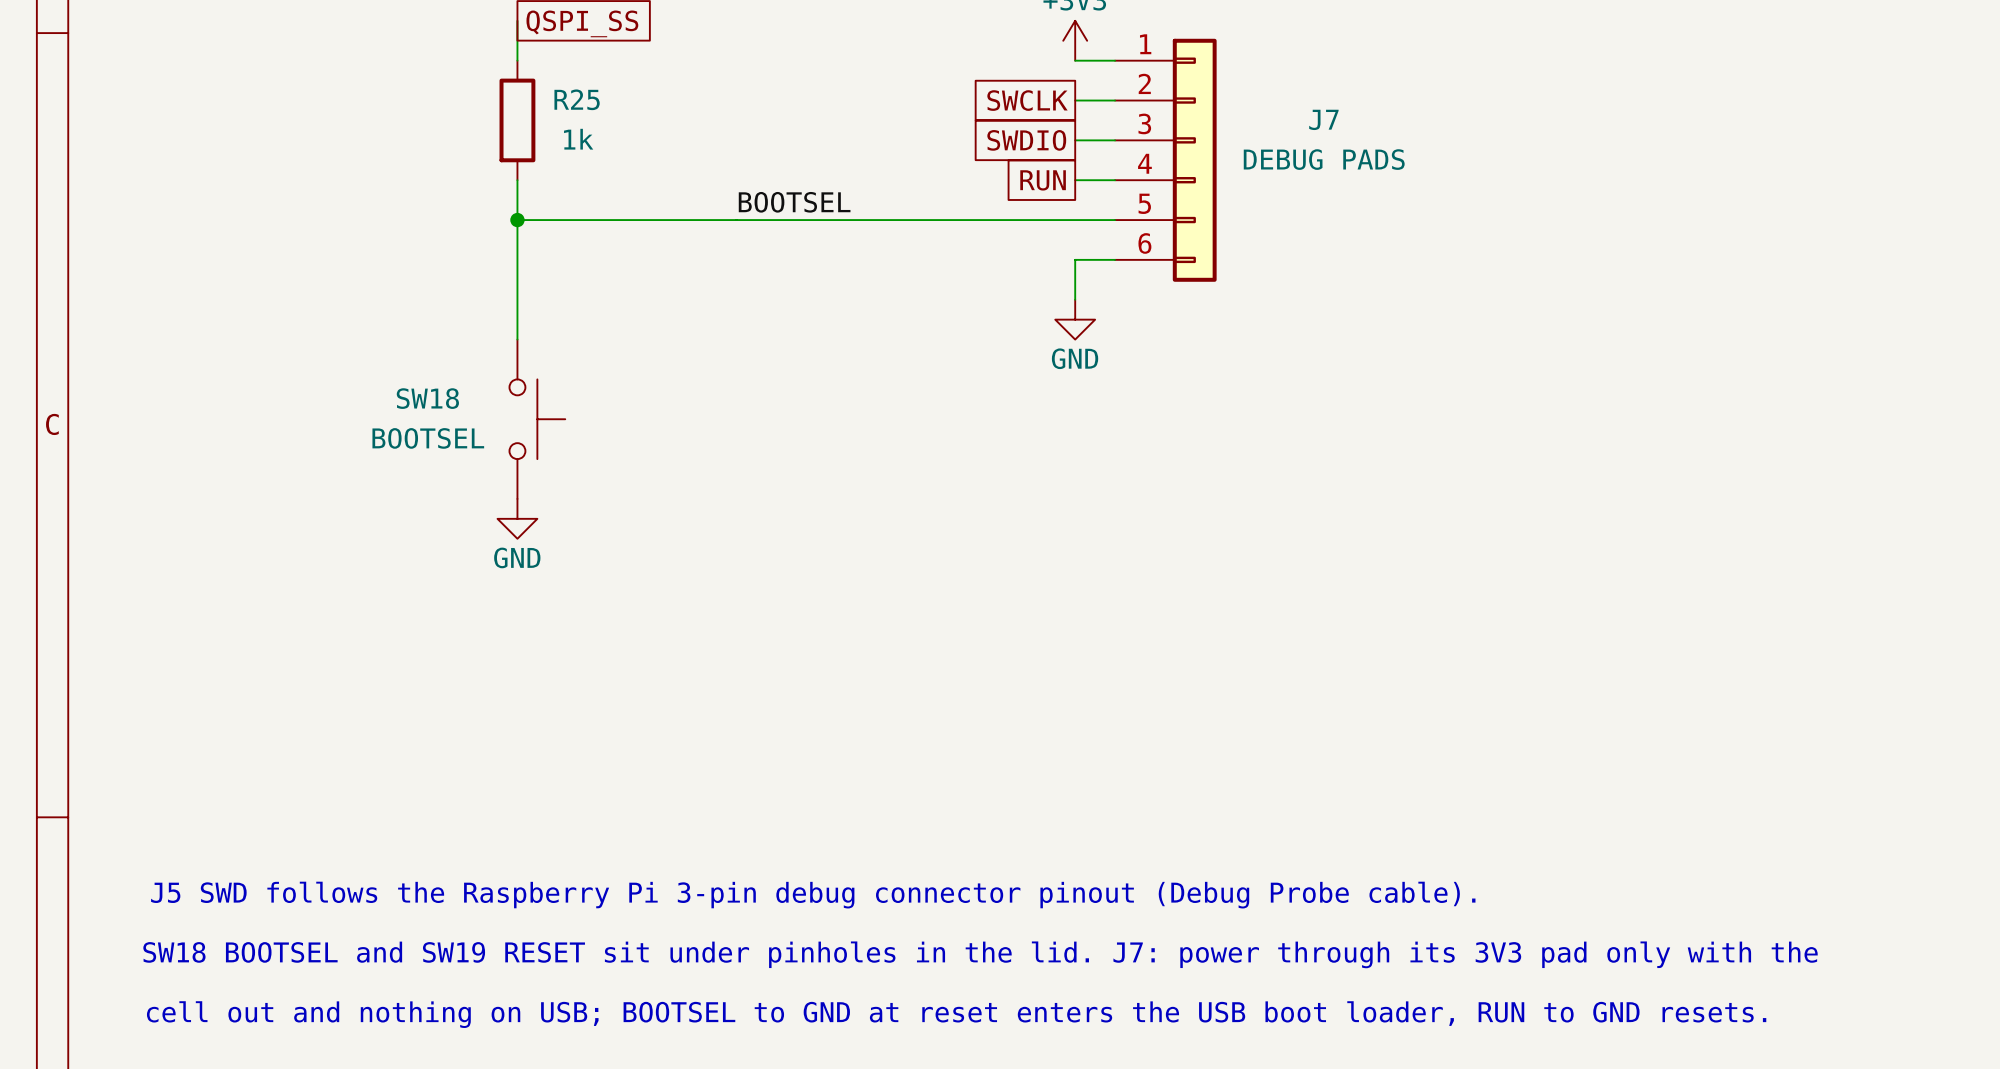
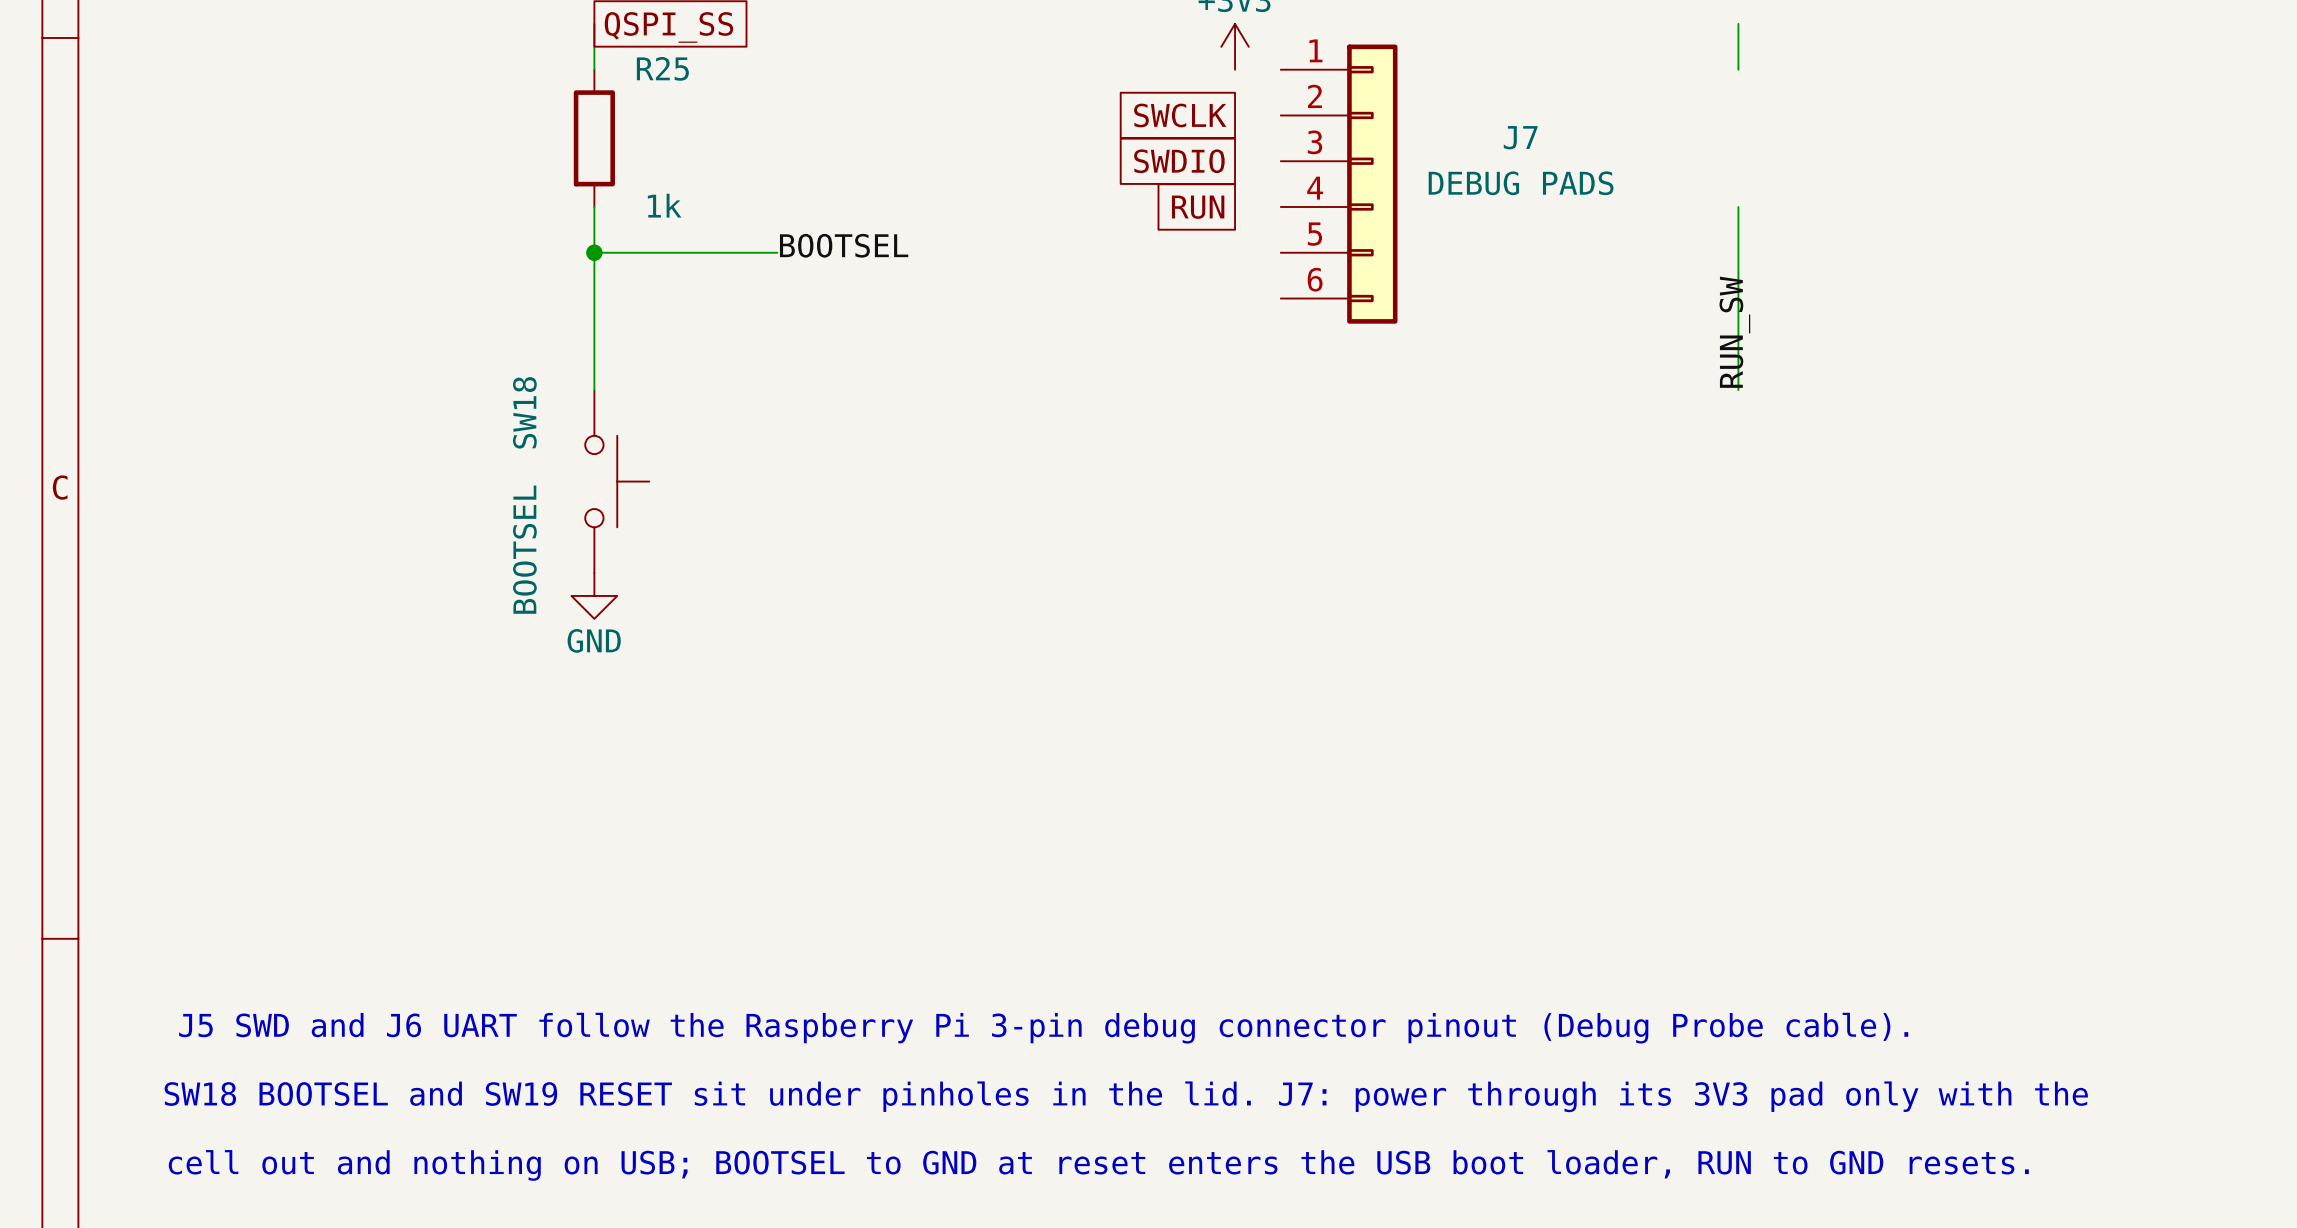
wire: none -> (1738, 23) (1738, 69)
wire: (1075, 60) (1115, 60) -> none
R25 name position: R25 (577, 99) -> R25 (662, 68)
wire: (1075, 100) (1115, 100) -> none
R25 value position: 1k (578, 139) -> 1k (664, 205)
wire: (1075, 140) (1115, 140) -> none
wire: (1075, 180) (1115, 180) -> none
wire: none -> (1738, 206) (1738, 390)
label position: BOOTSEL (794, 202) -> BOOTSEL (844, 245)
wire: (676, 220) (1115, 220) -> none
wire: (1115, 259) (1075, 259) (1075, 299) -> none
label: none -> RUN_SW (1734, 332)
power symbol: GND (1075, 319) -> none
SW18 name rotation: 0° (427, 398) -> 90° counterclockwise (524, 412)
SW18 value rotation: 0° (428, 438) -> 90° counterclockwise (524, 549)
text: J5 SWD follows the Raspberry Pi 3-pin debug connector pinout (Debug Probe cable). (813, 895) -> J5 SWD and J6 UART follow the Raspberry Pi 3-pin debug connector pinout (Debug Probe cable). (1043, 1028)

